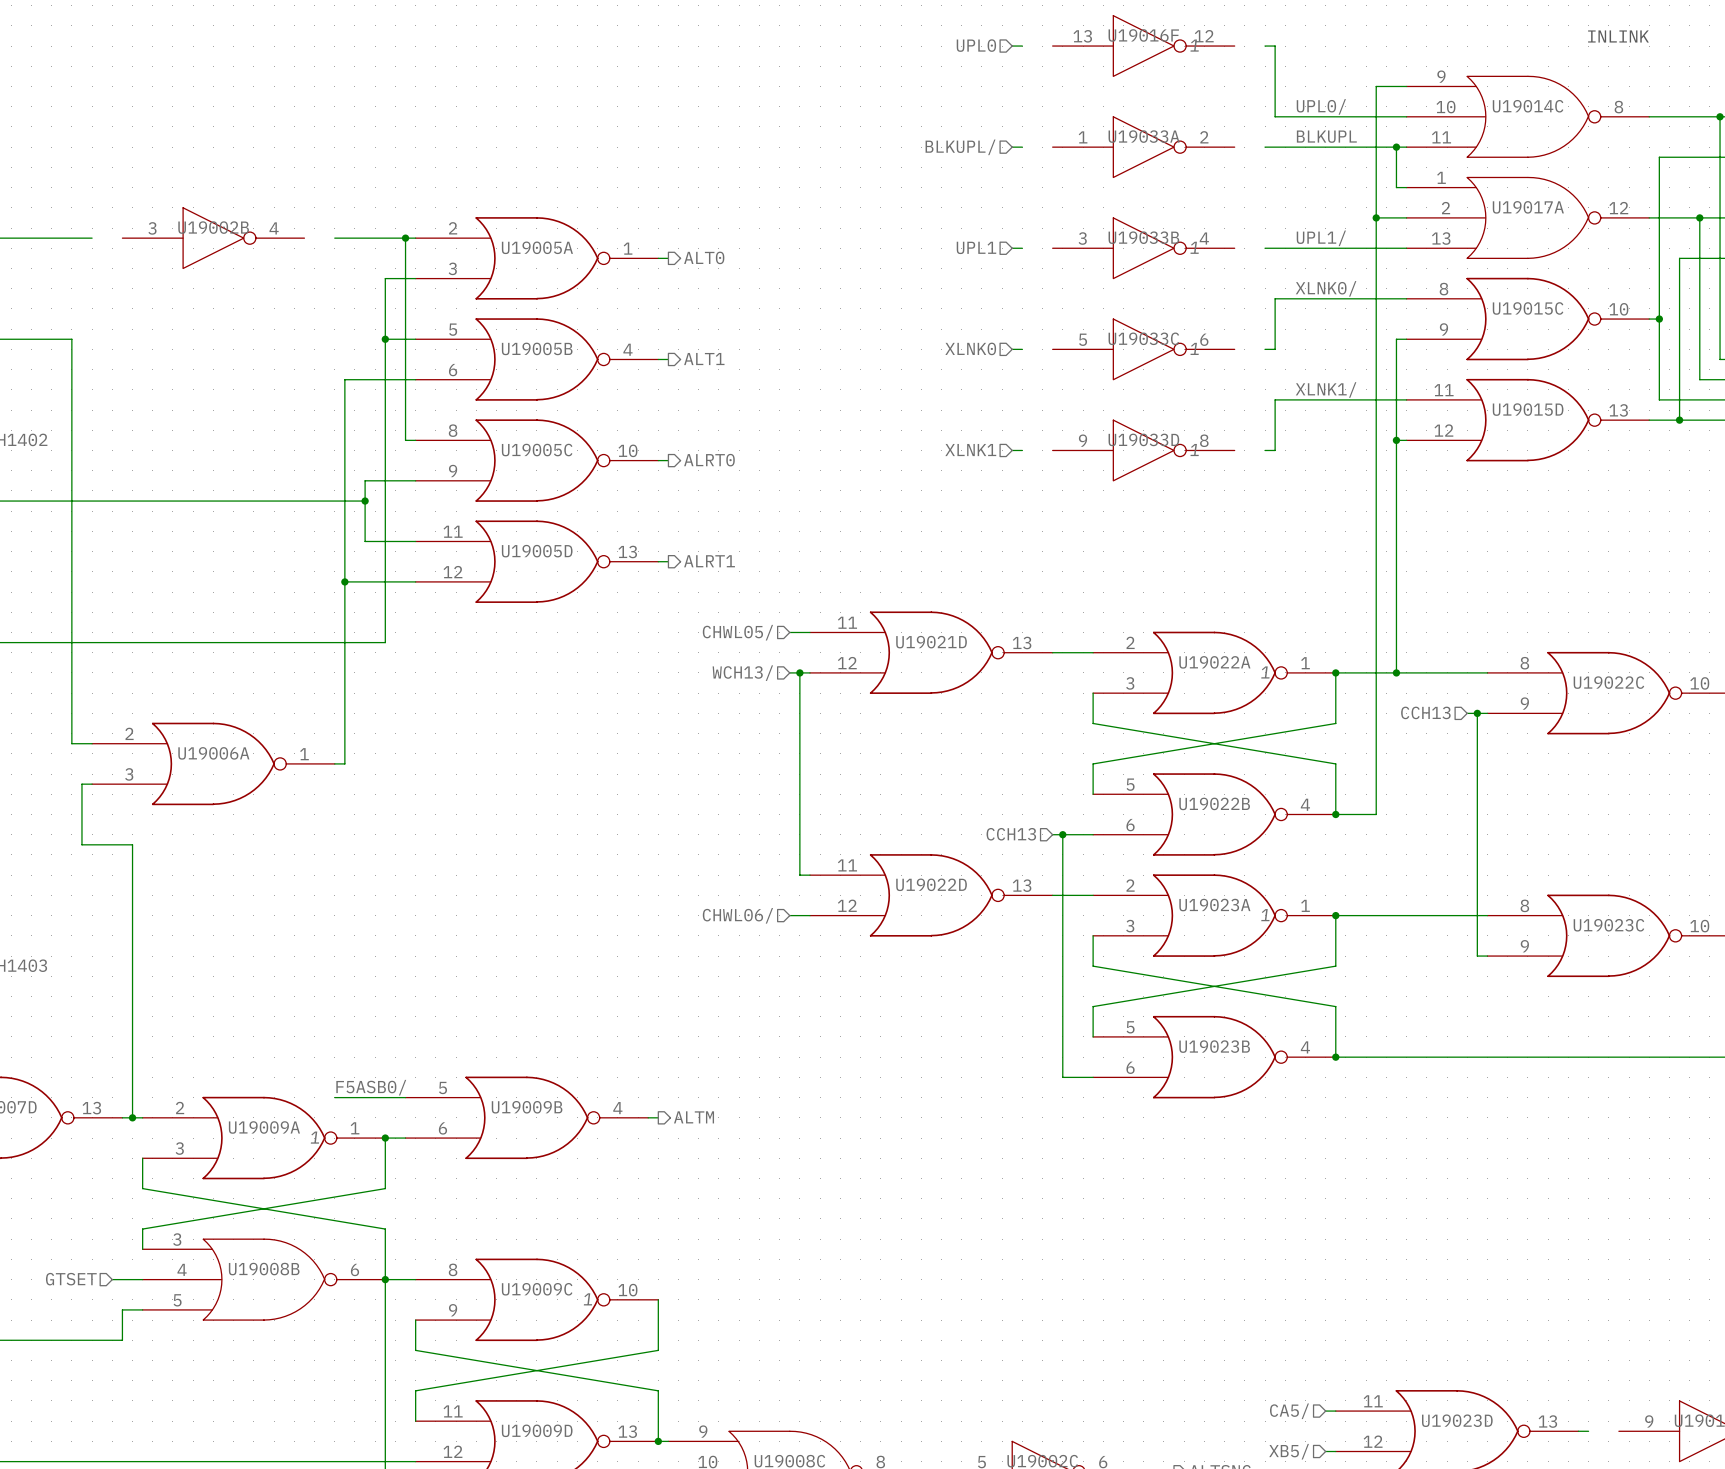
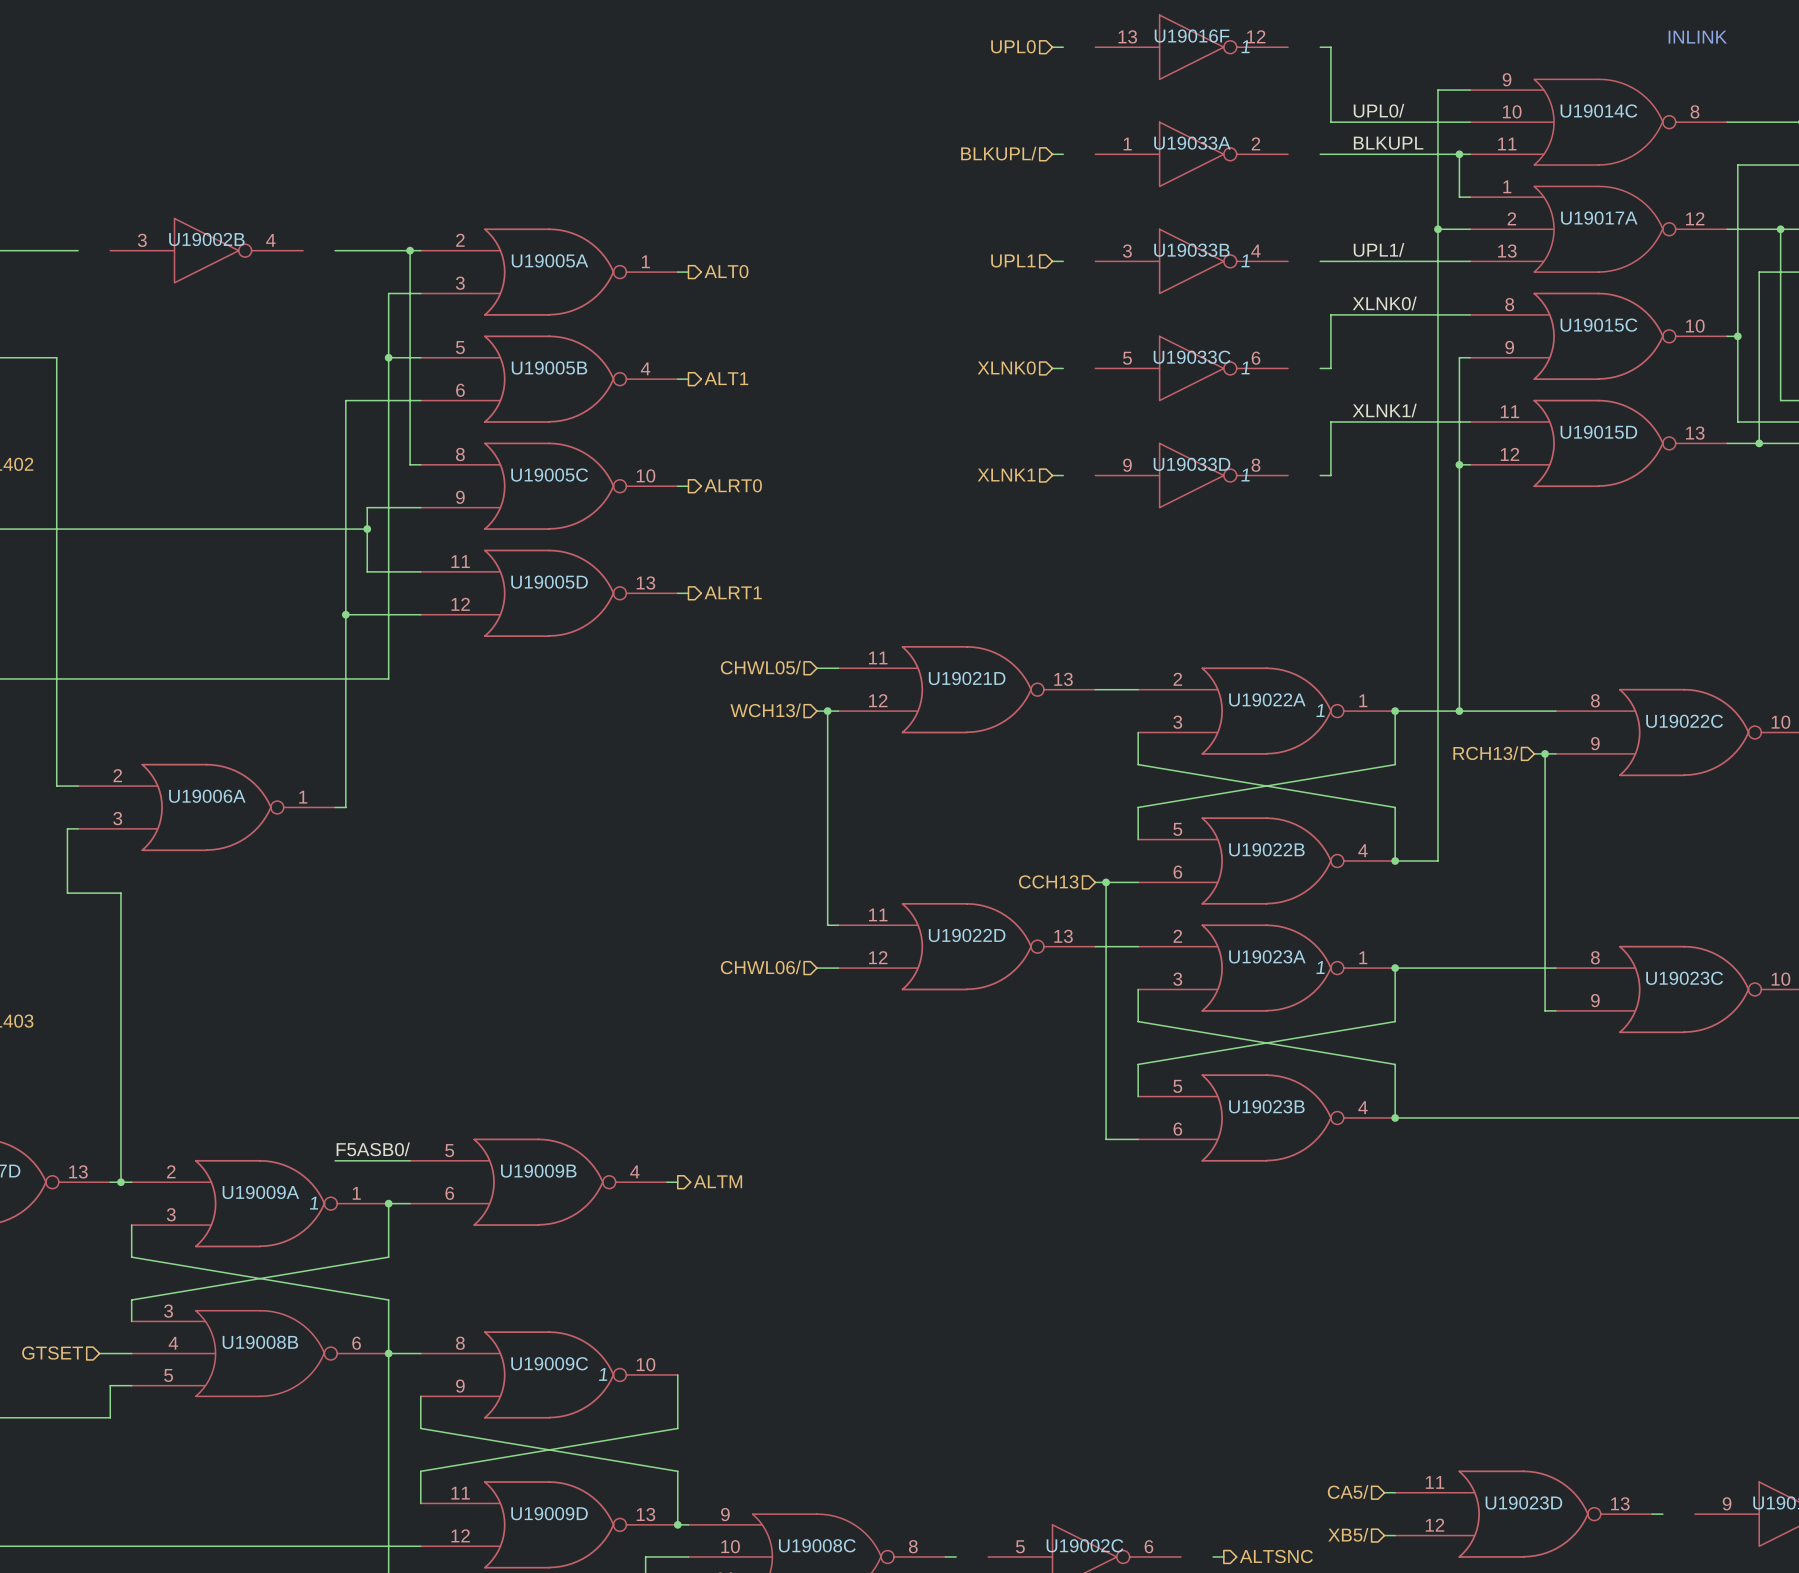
hierarchical label: CCH13 (1425, 712) -> RCH13/ (1485, 753)

